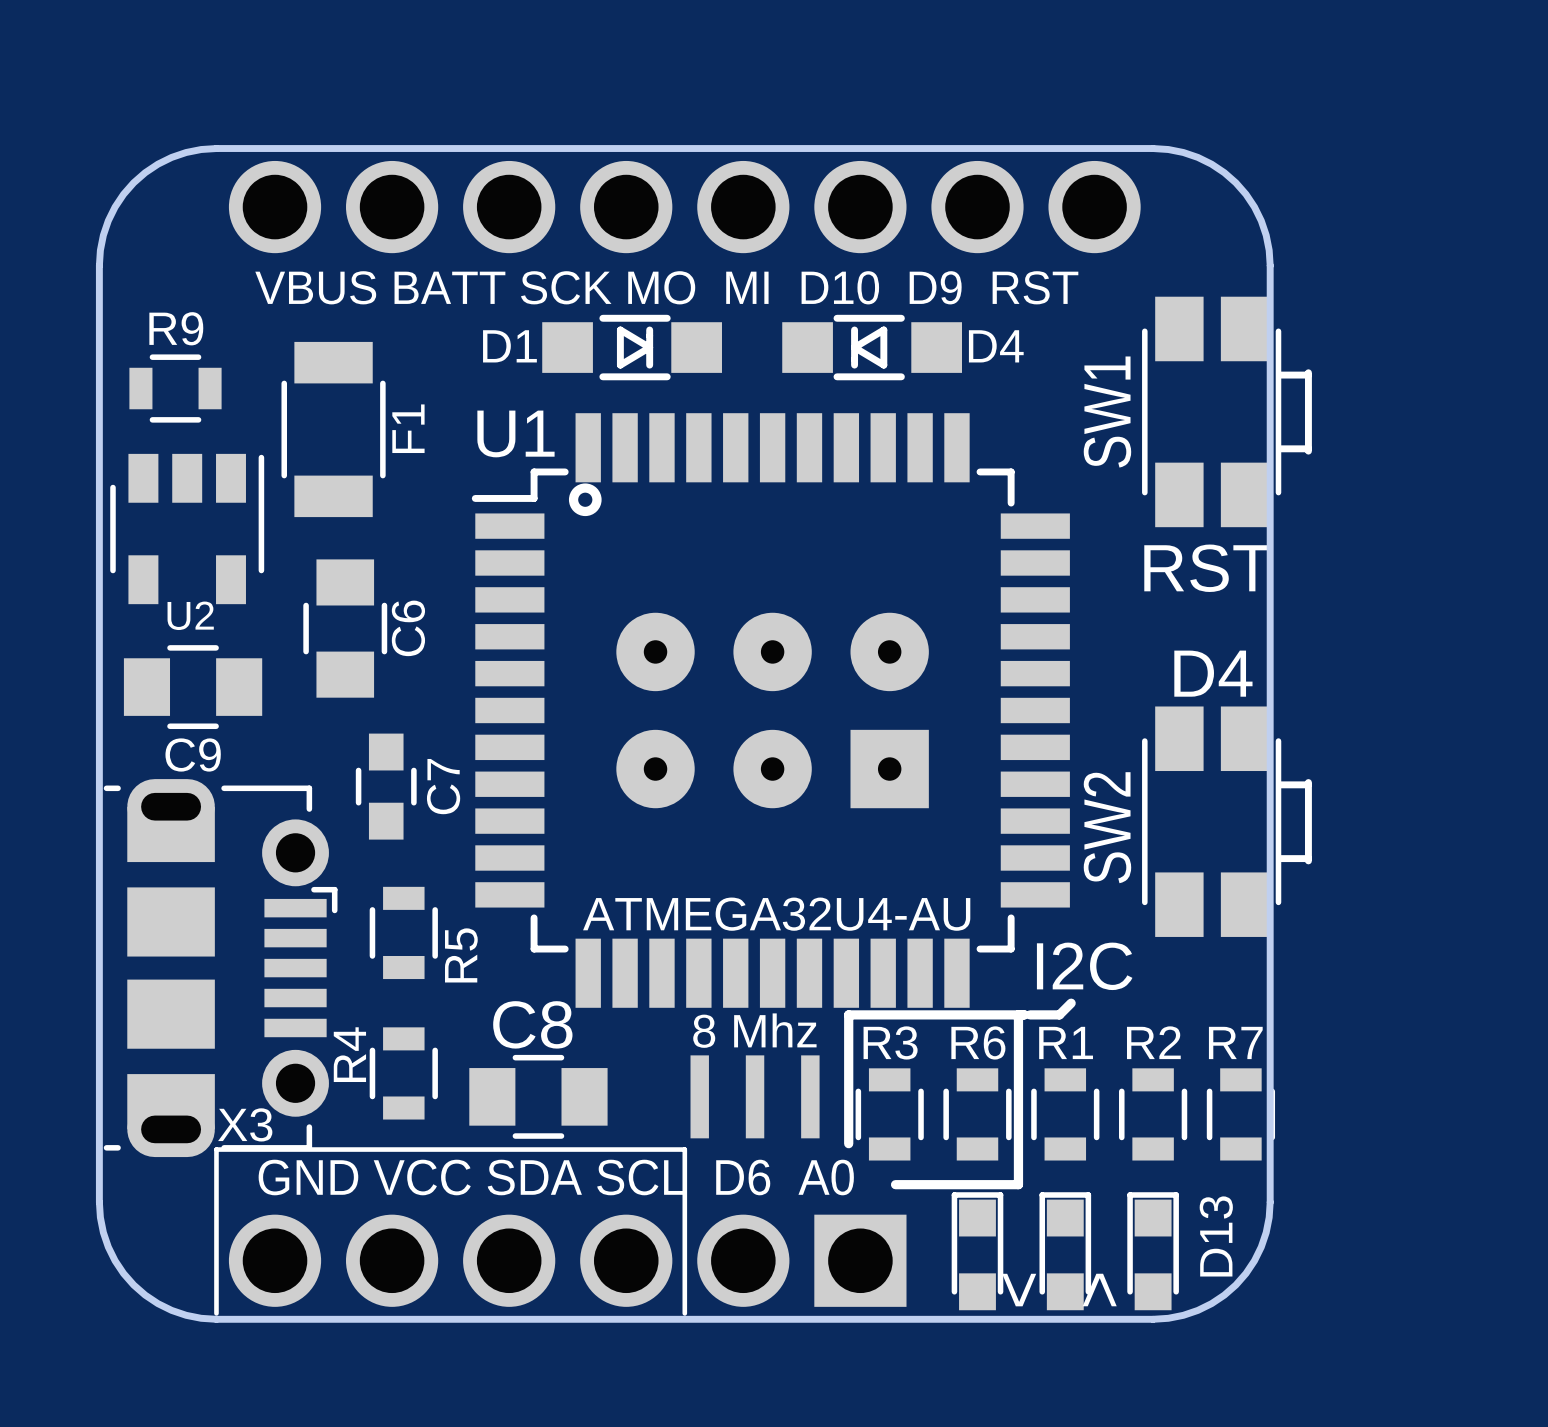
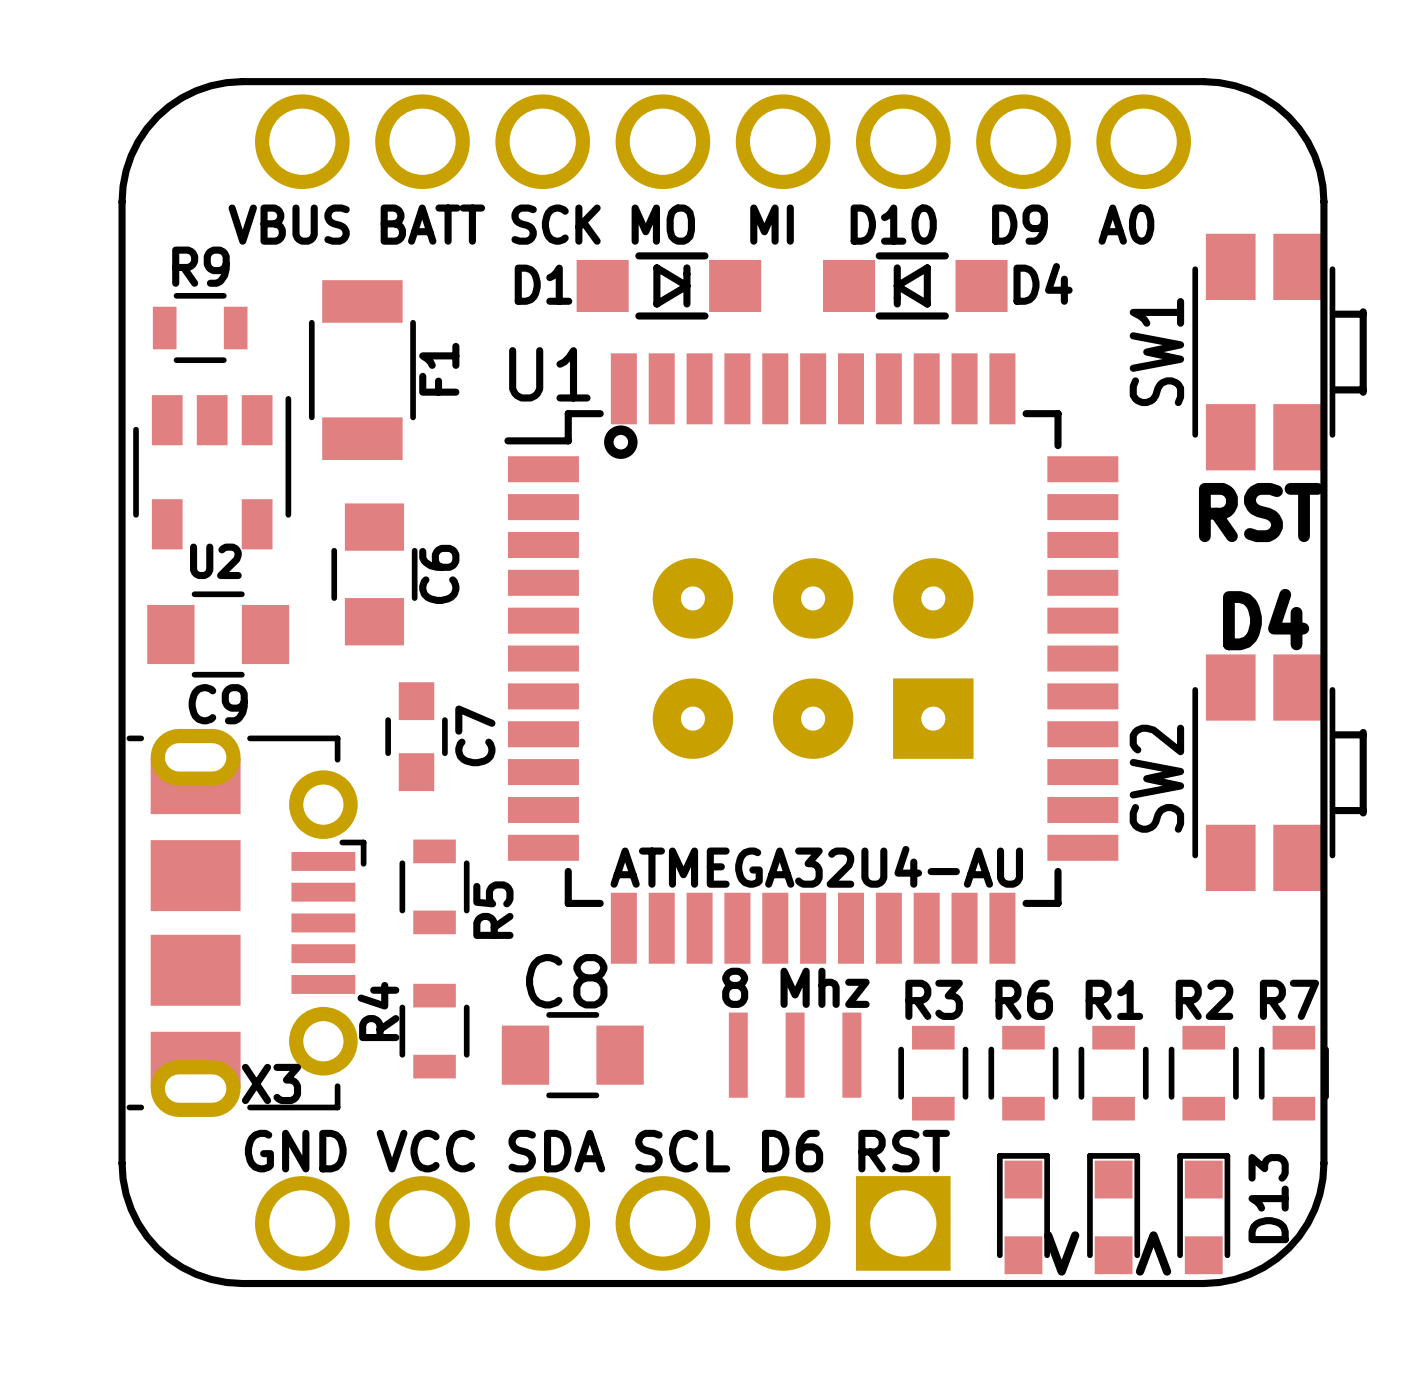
part text: none -> VBUS BATT SCK MO MI D10 D9 A0 (691, 224)
part text: VBUS BATT SCK MO MI D10 D9 RST (666, 287) -> none
text: I2C (1084, 966) -> none
line: (1071, 1003) (1059, 1014) (1030, 1014) -> none
line: (1018, 1014) (1018, 1184) (895, 1184) -> none
line: (1024, 1014) (848, 1014) (848, 1143) -> none
part footprint: [214, 1147, 907, 1316] -> [255, 1176, 951, 1271]

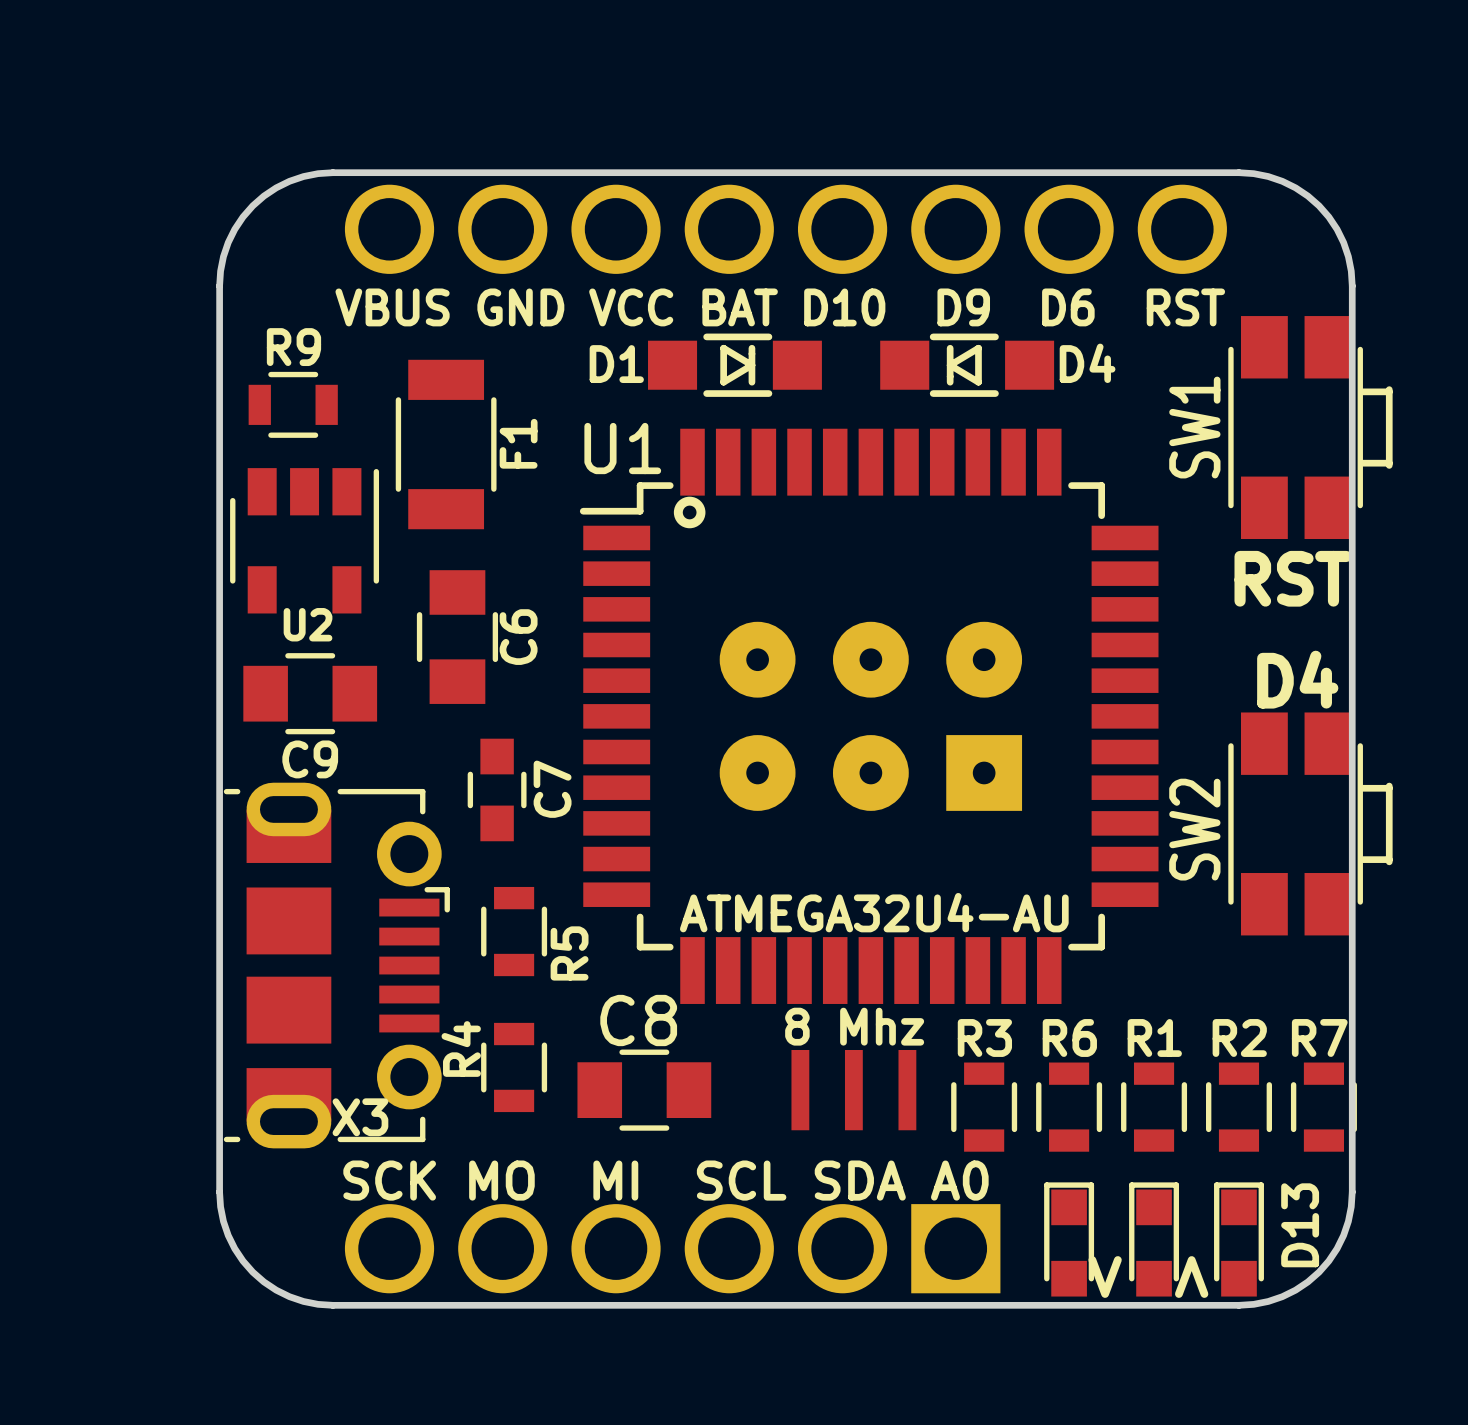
part text: VBUS BATT SCK MO MI D10 D9 A0 (691, 224) -> none
part text: none -> VBUS GND VCC BAT D10 D9 D6 RST (780, 307)
part text: GND VCC SDA SCL D6 RST (597, 1151) -> SCK MO MI SCL SDA A0 (665, 1180)

